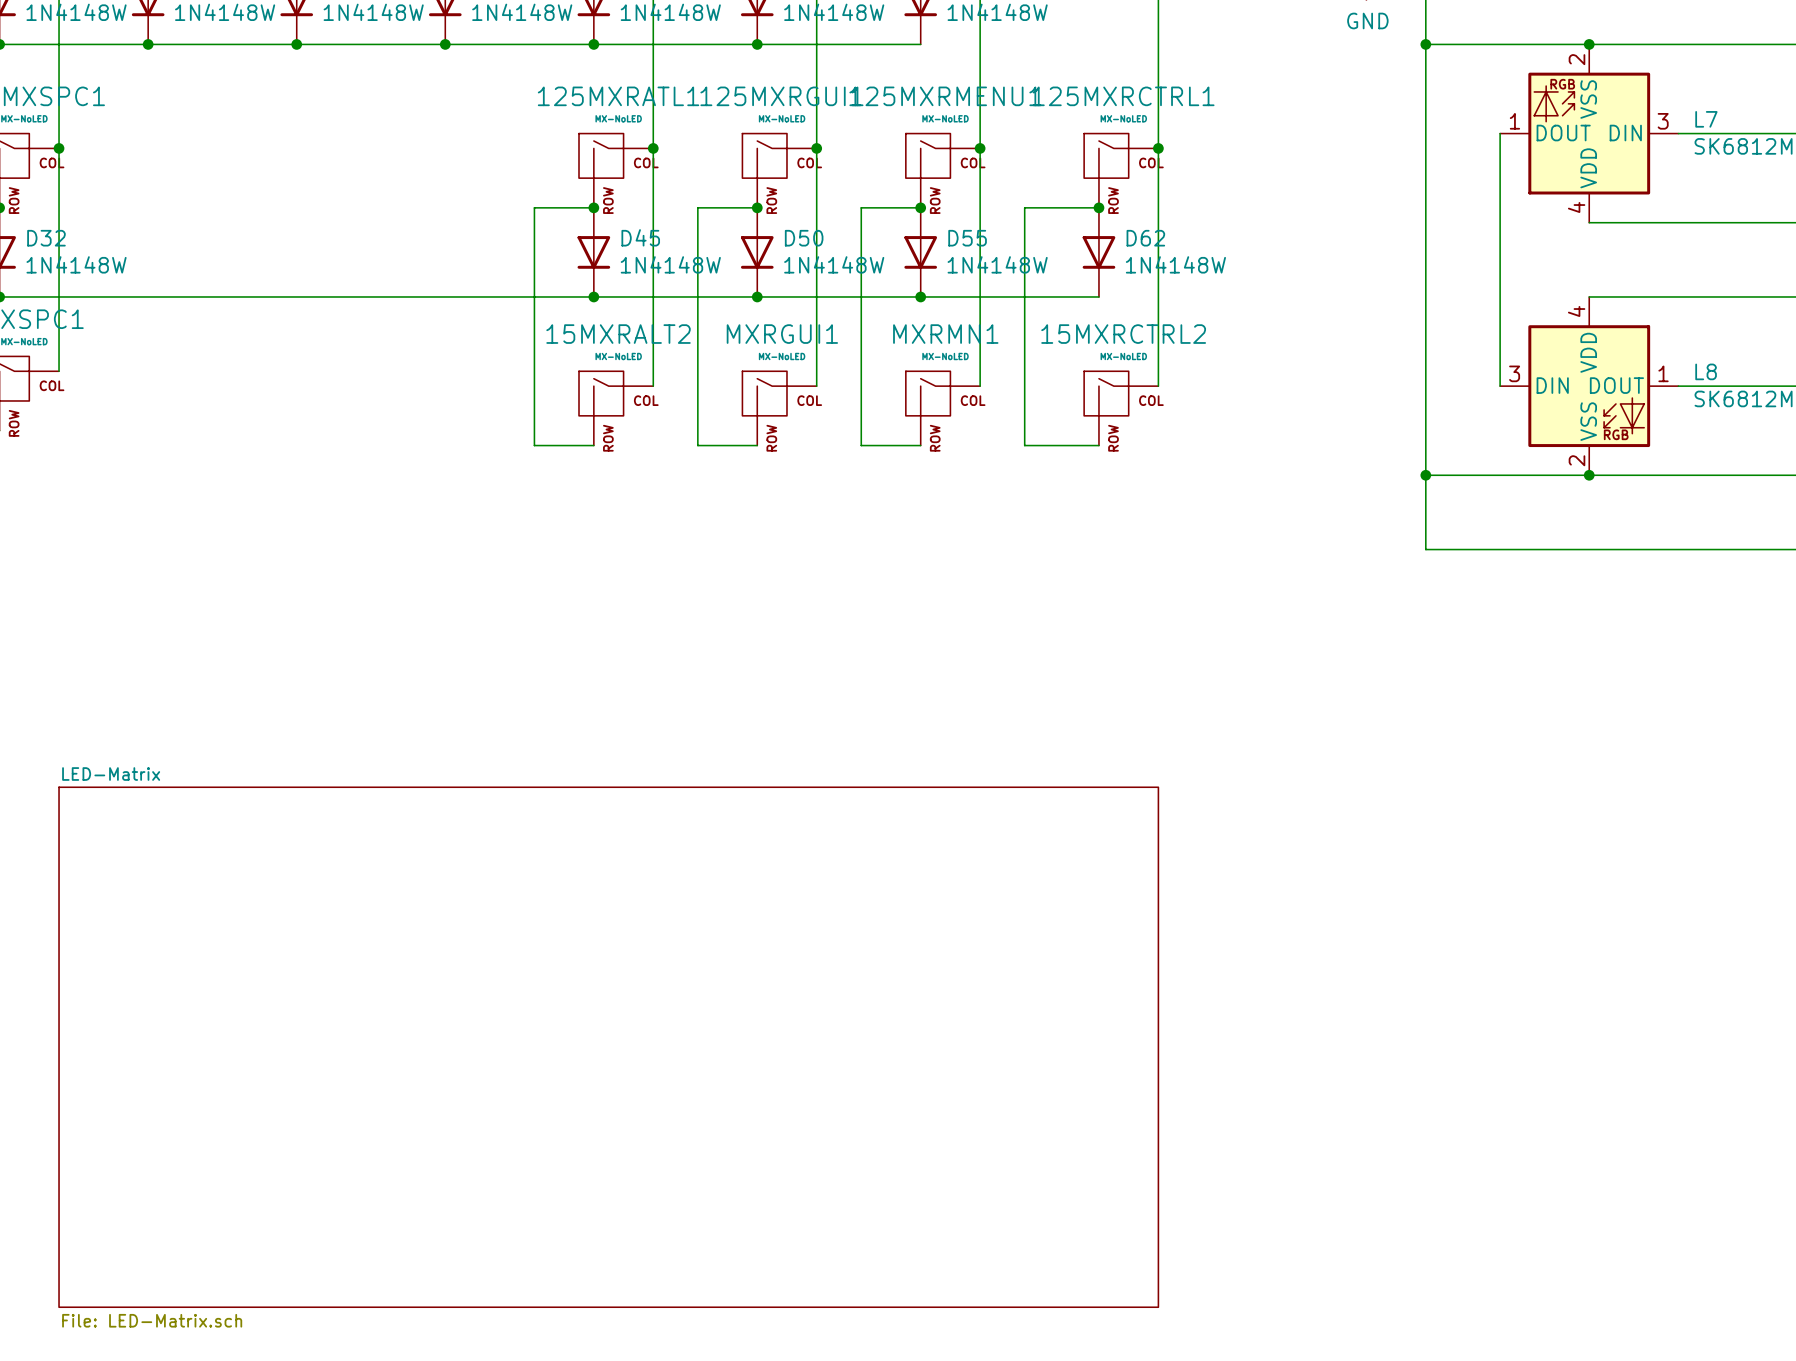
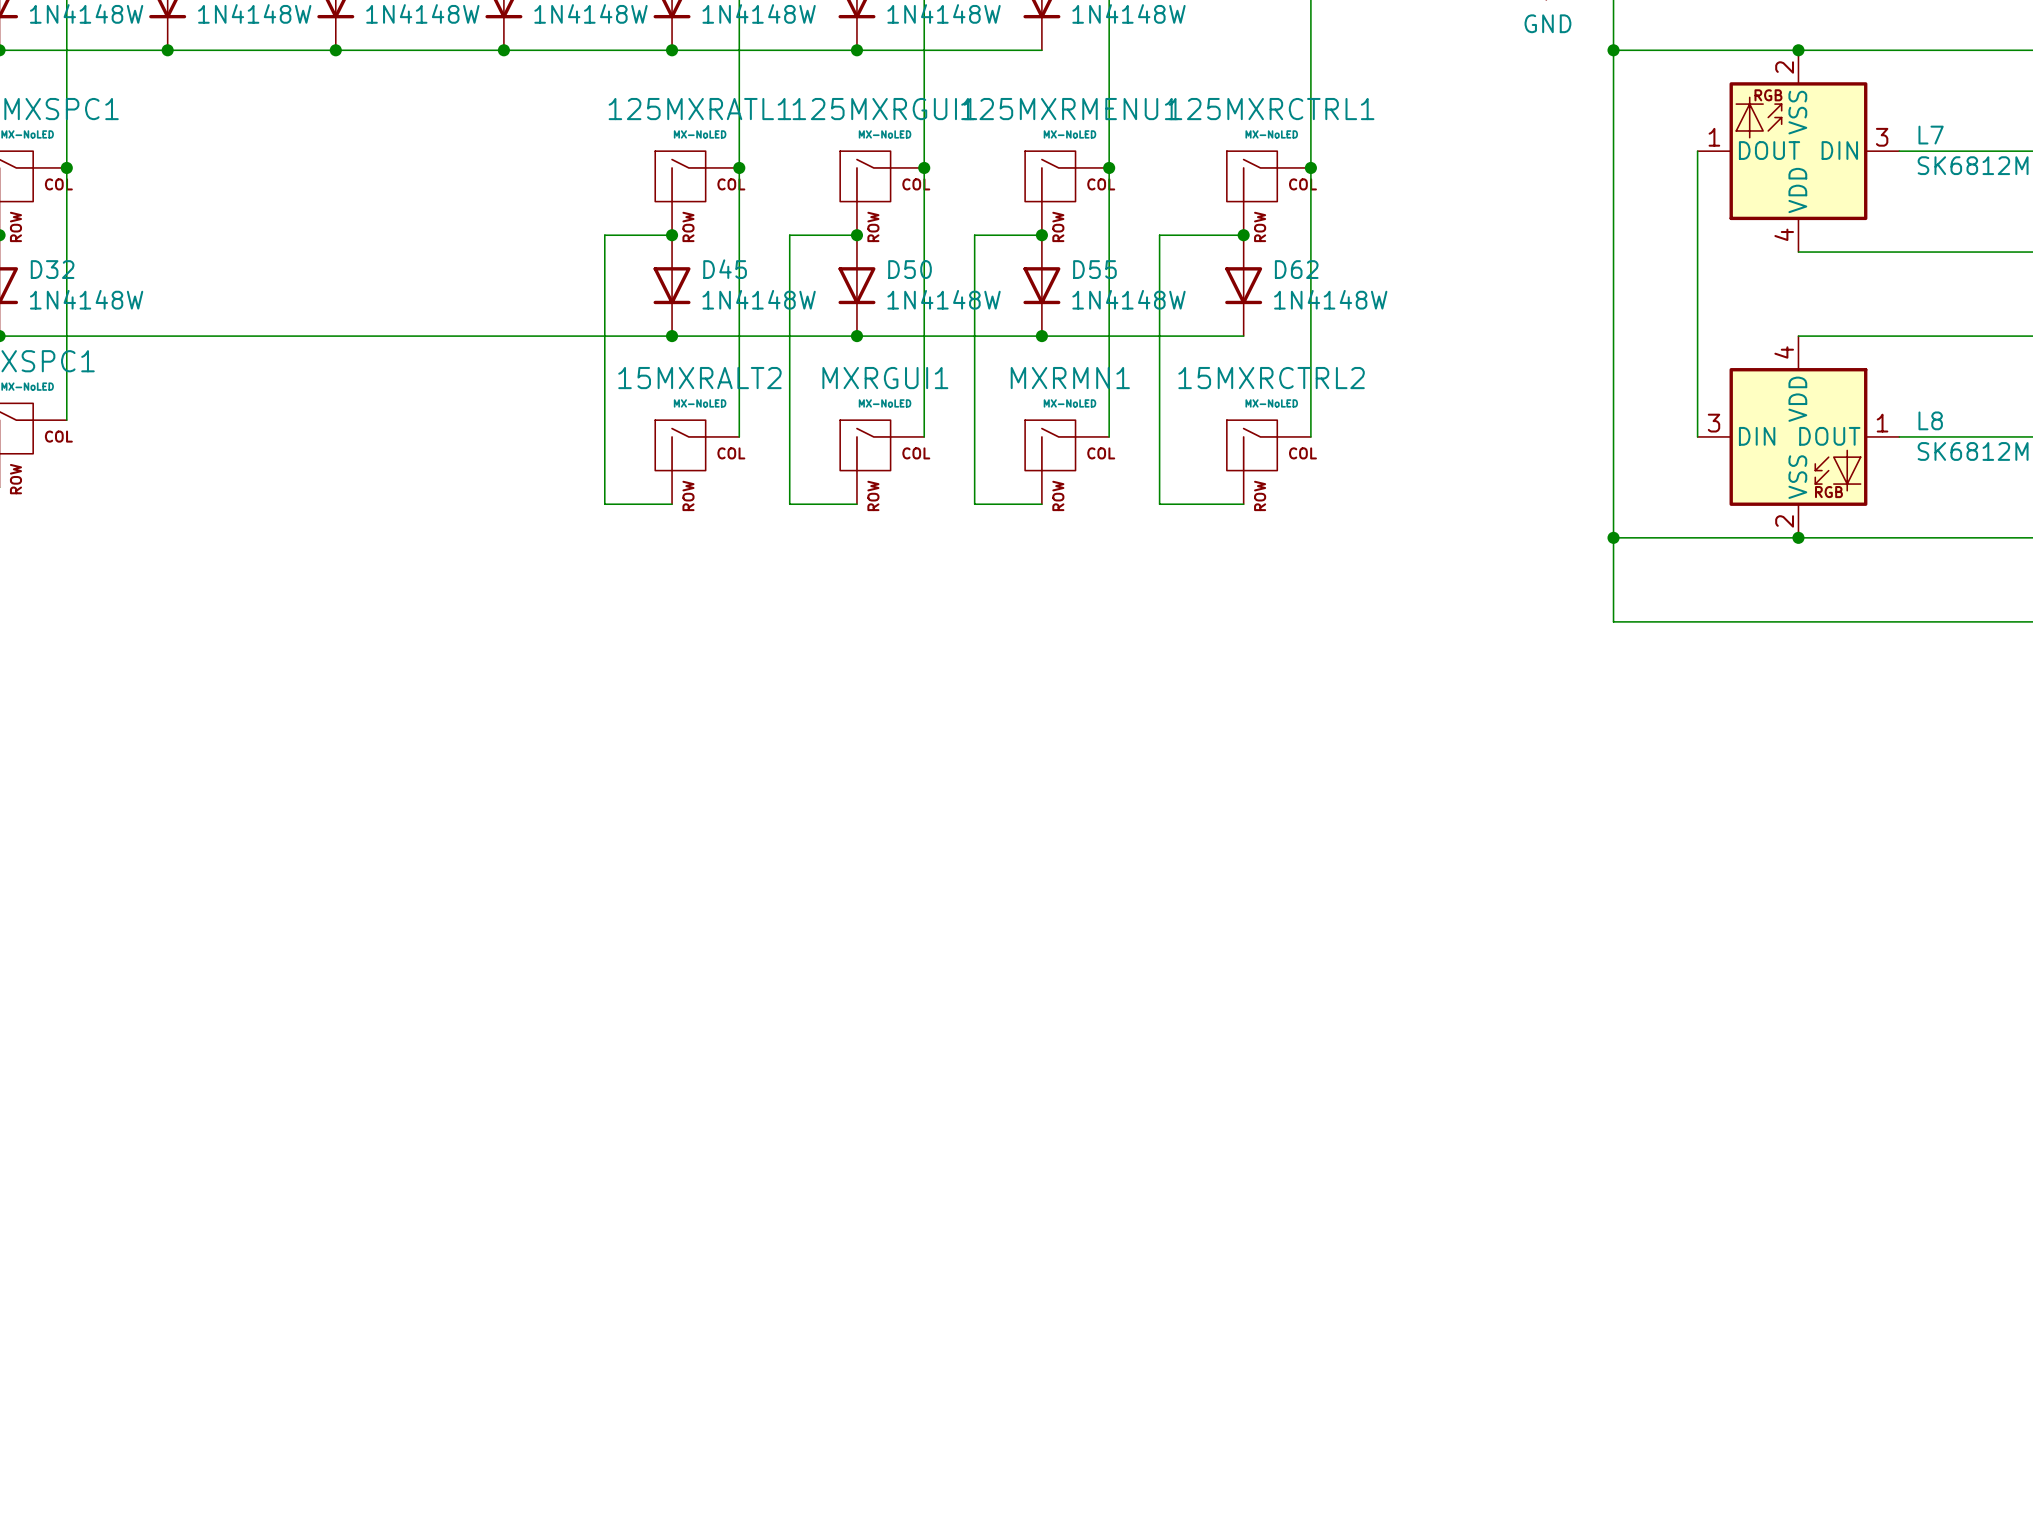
sheet LED-Matrix: File: LED-Matrix.sch (608, 1047) -> none

